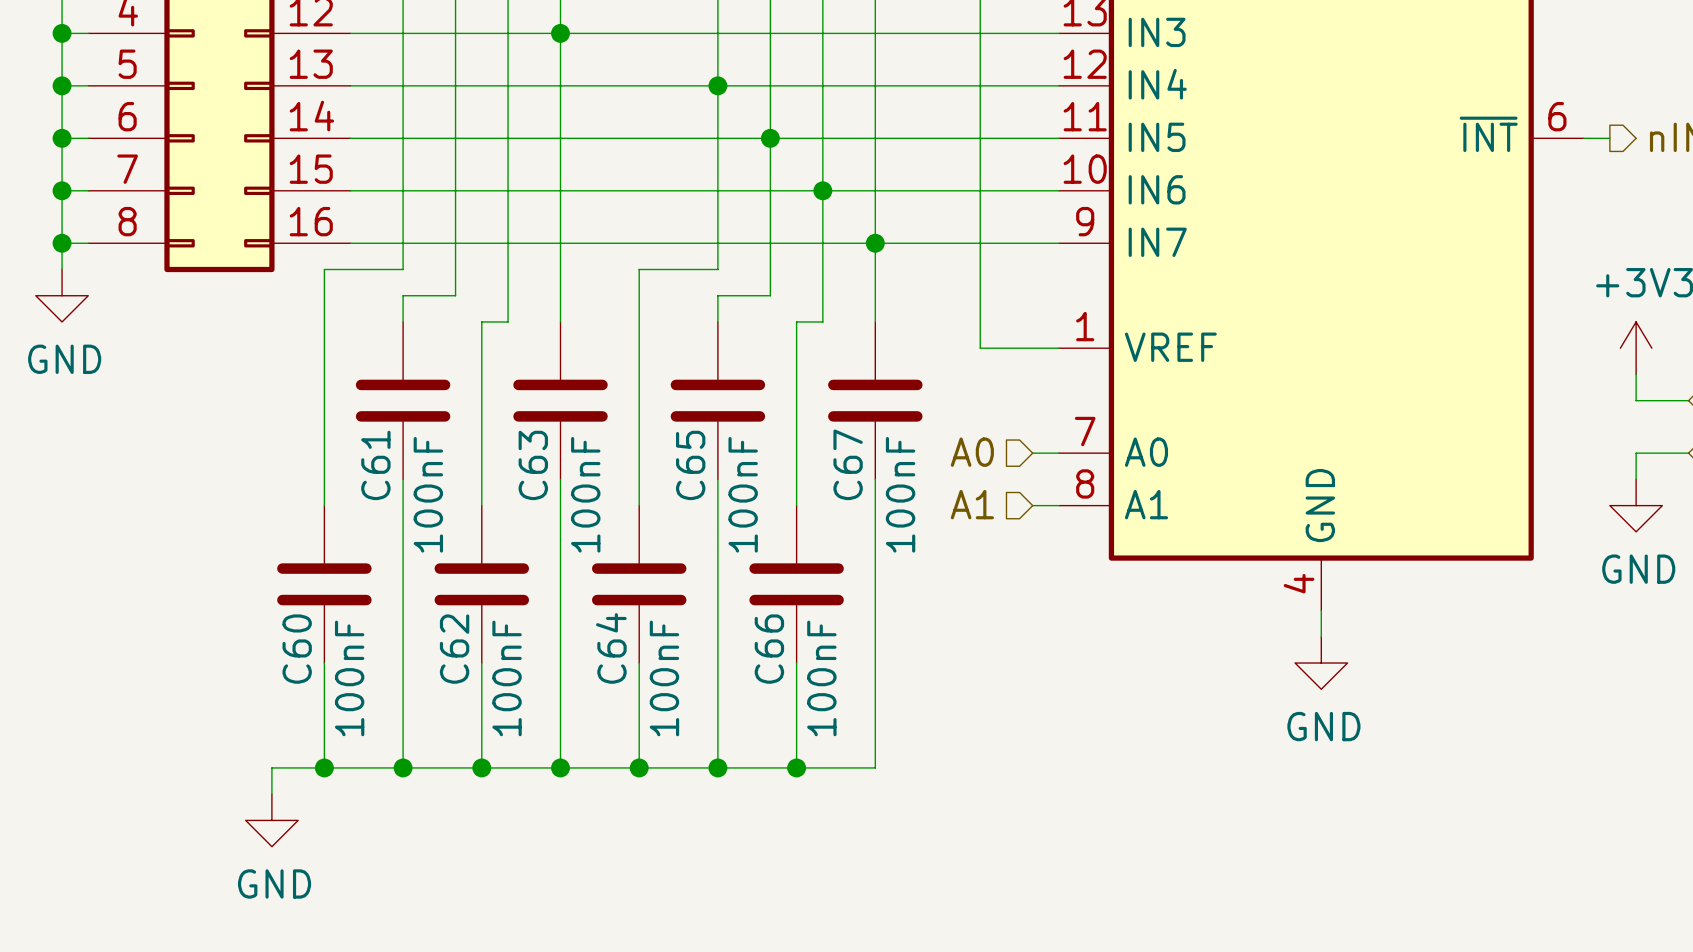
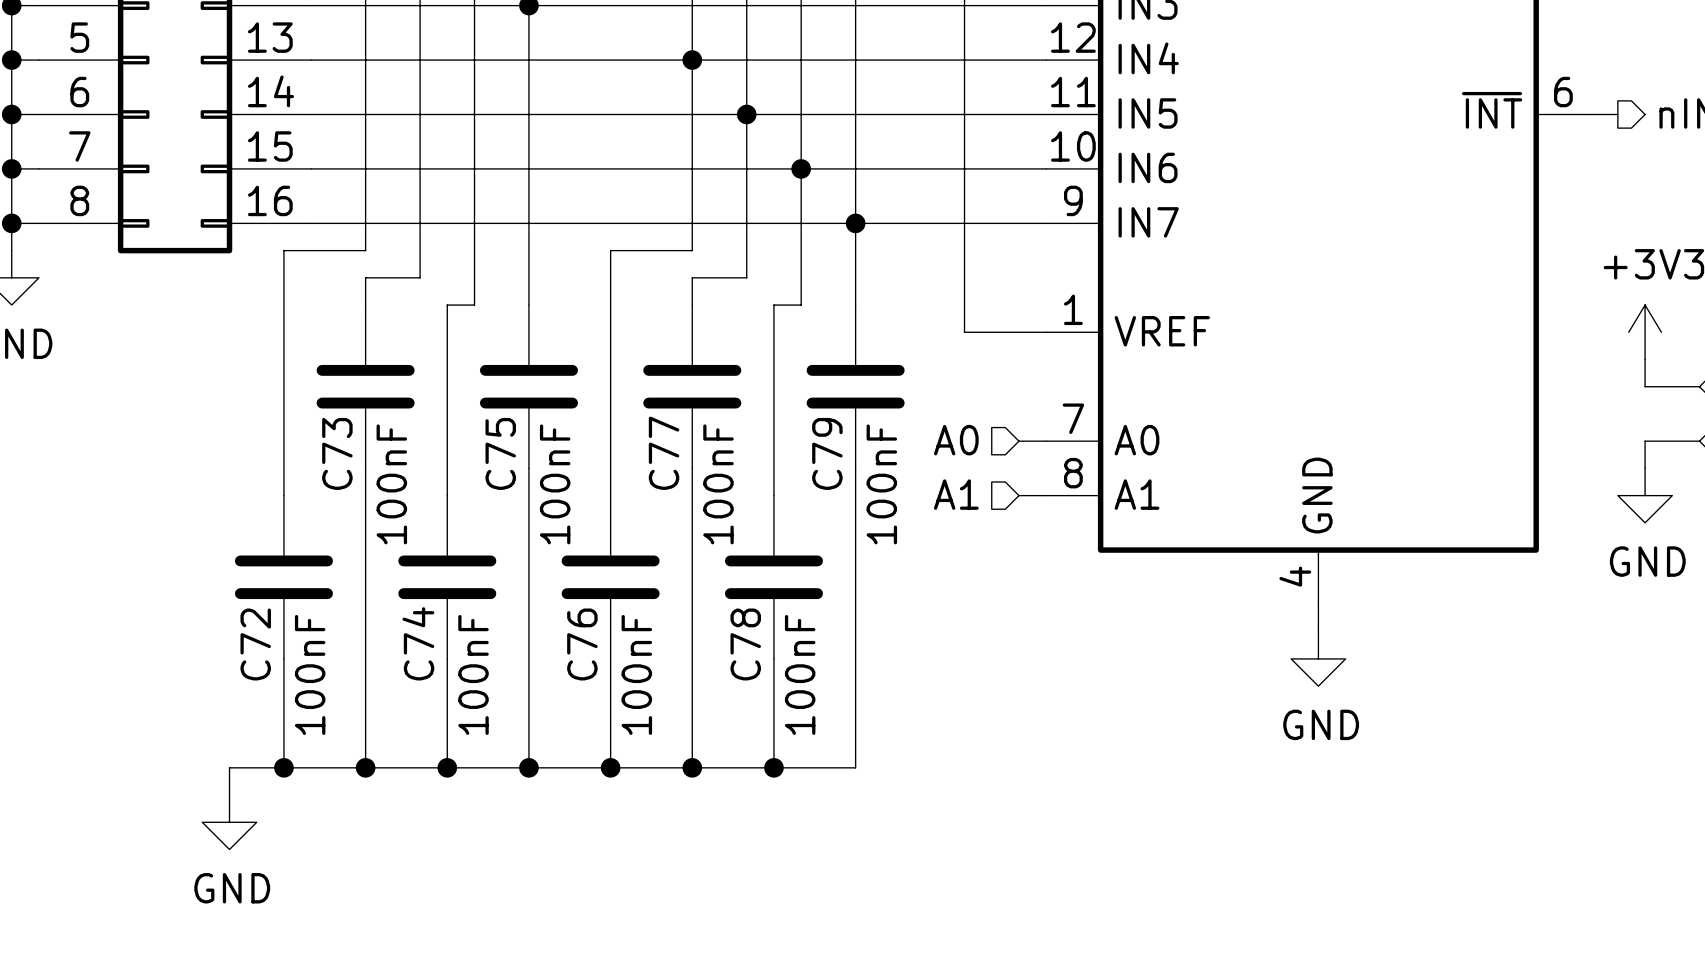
C67 name: C67 (848, 464) -> C79 (827, 453)
C61 name: C61 (375, 465) -> C73 (337, 453)
C63 name: C63 (533, 465) -> C75 (500, 453)
C65 name: C65 (690, 465) -> C77 (664, 453)
C64 name: C64 (611, 648) -> C76 (582, 644)
C60 name: C60 (297, 649) -> C72 (255, 644)
C62 name: C62 (454, 649) -> C74 (418, 643)
C66 name: C66 (769, 649) -> C78 (745, 644)

